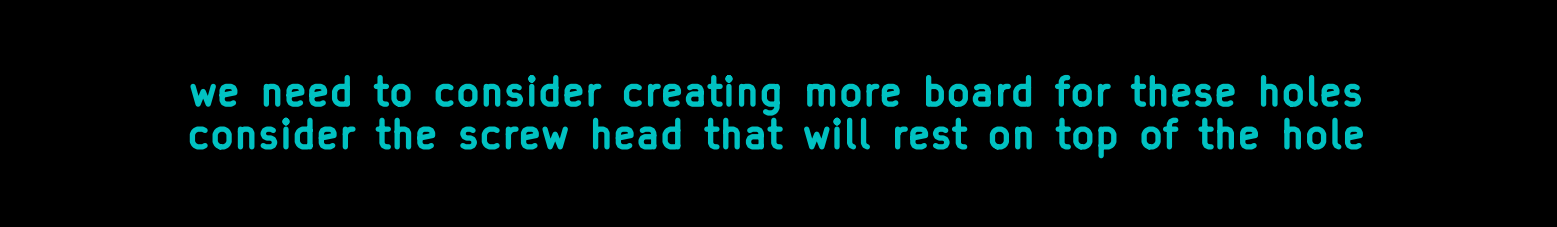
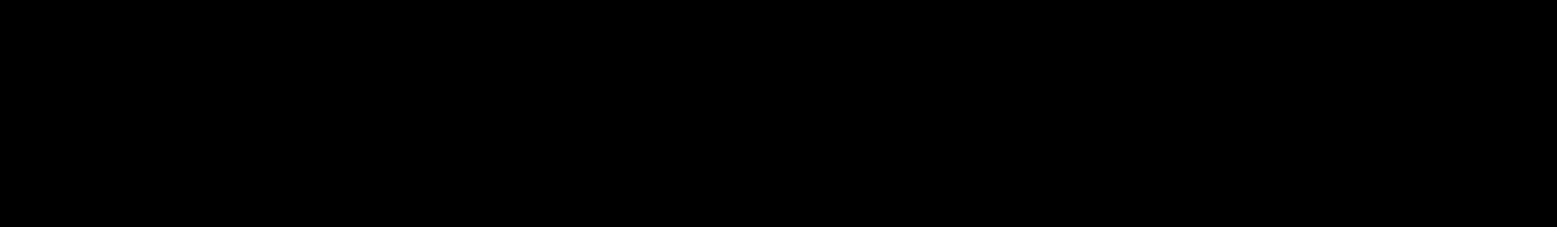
text: we need to consider creating more board for these holes (775, 95) -> none
text: consider the screw head that will rest on top of the hole (776, 138) -> none

